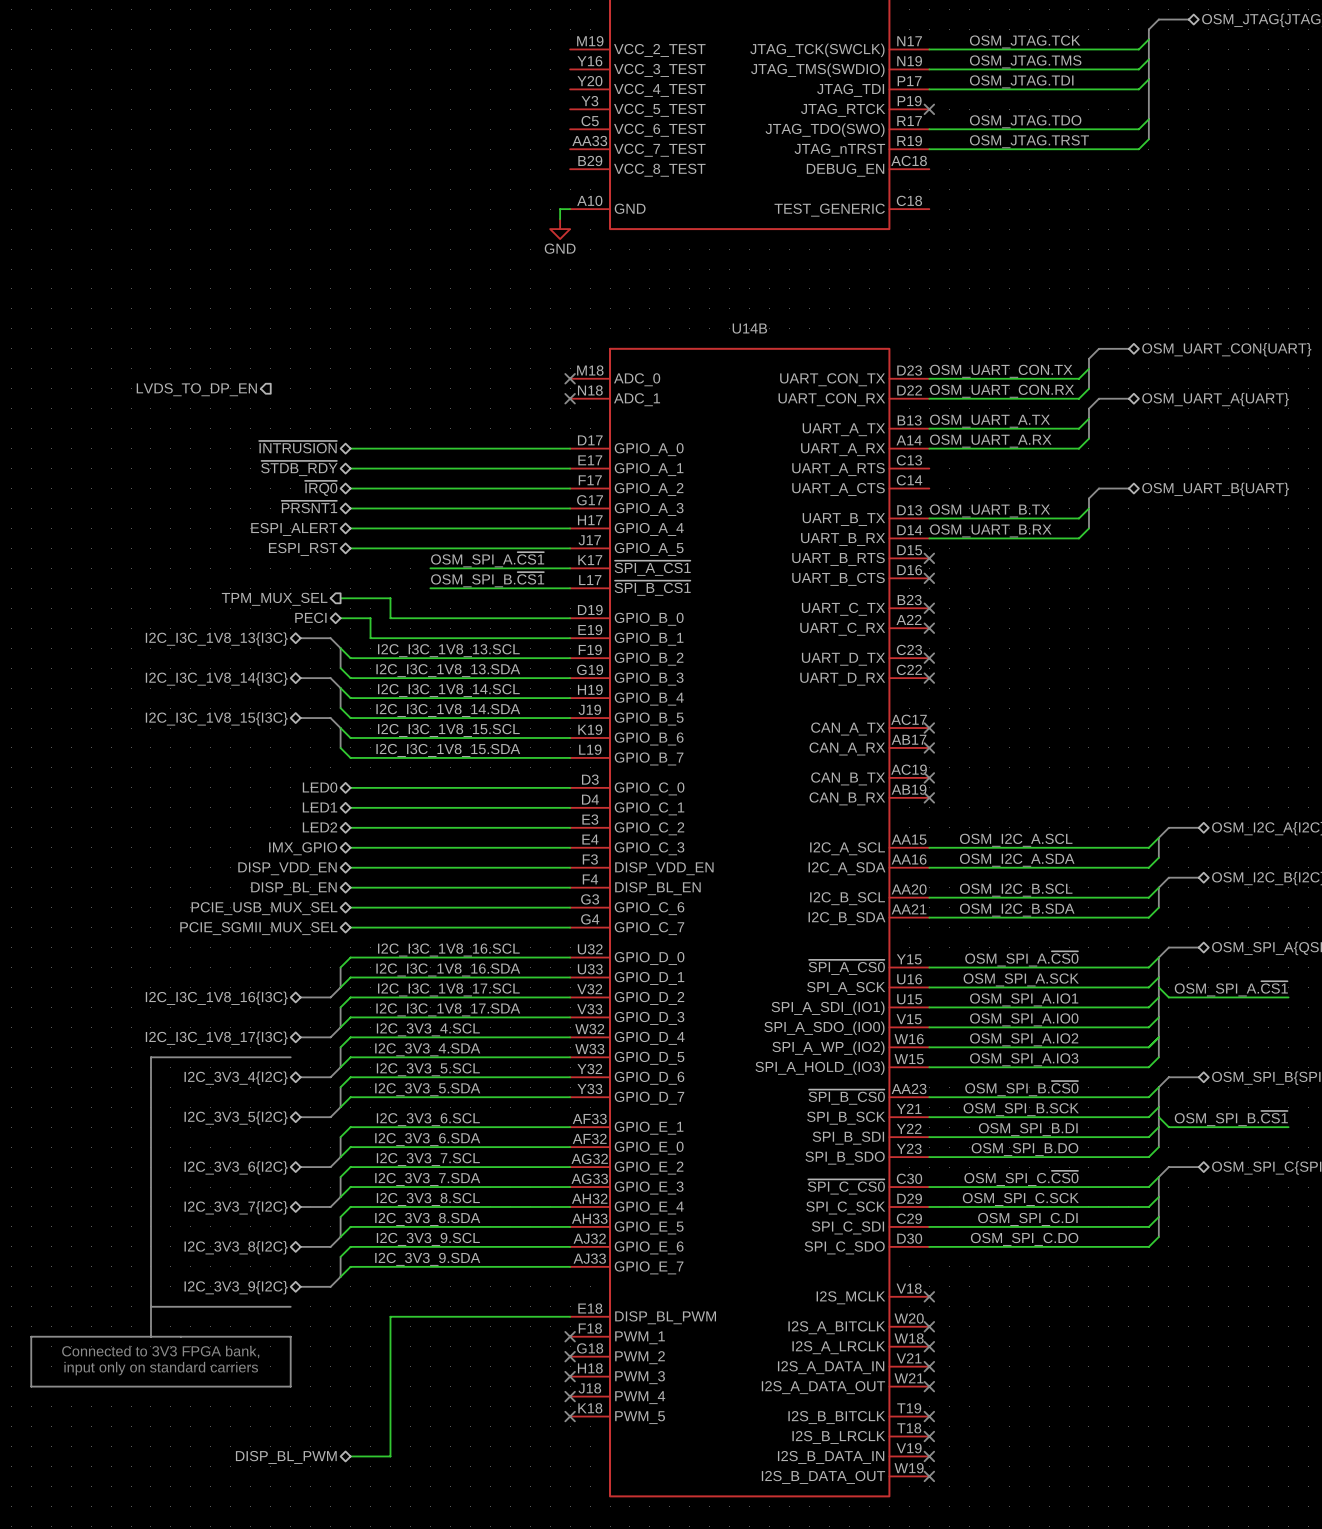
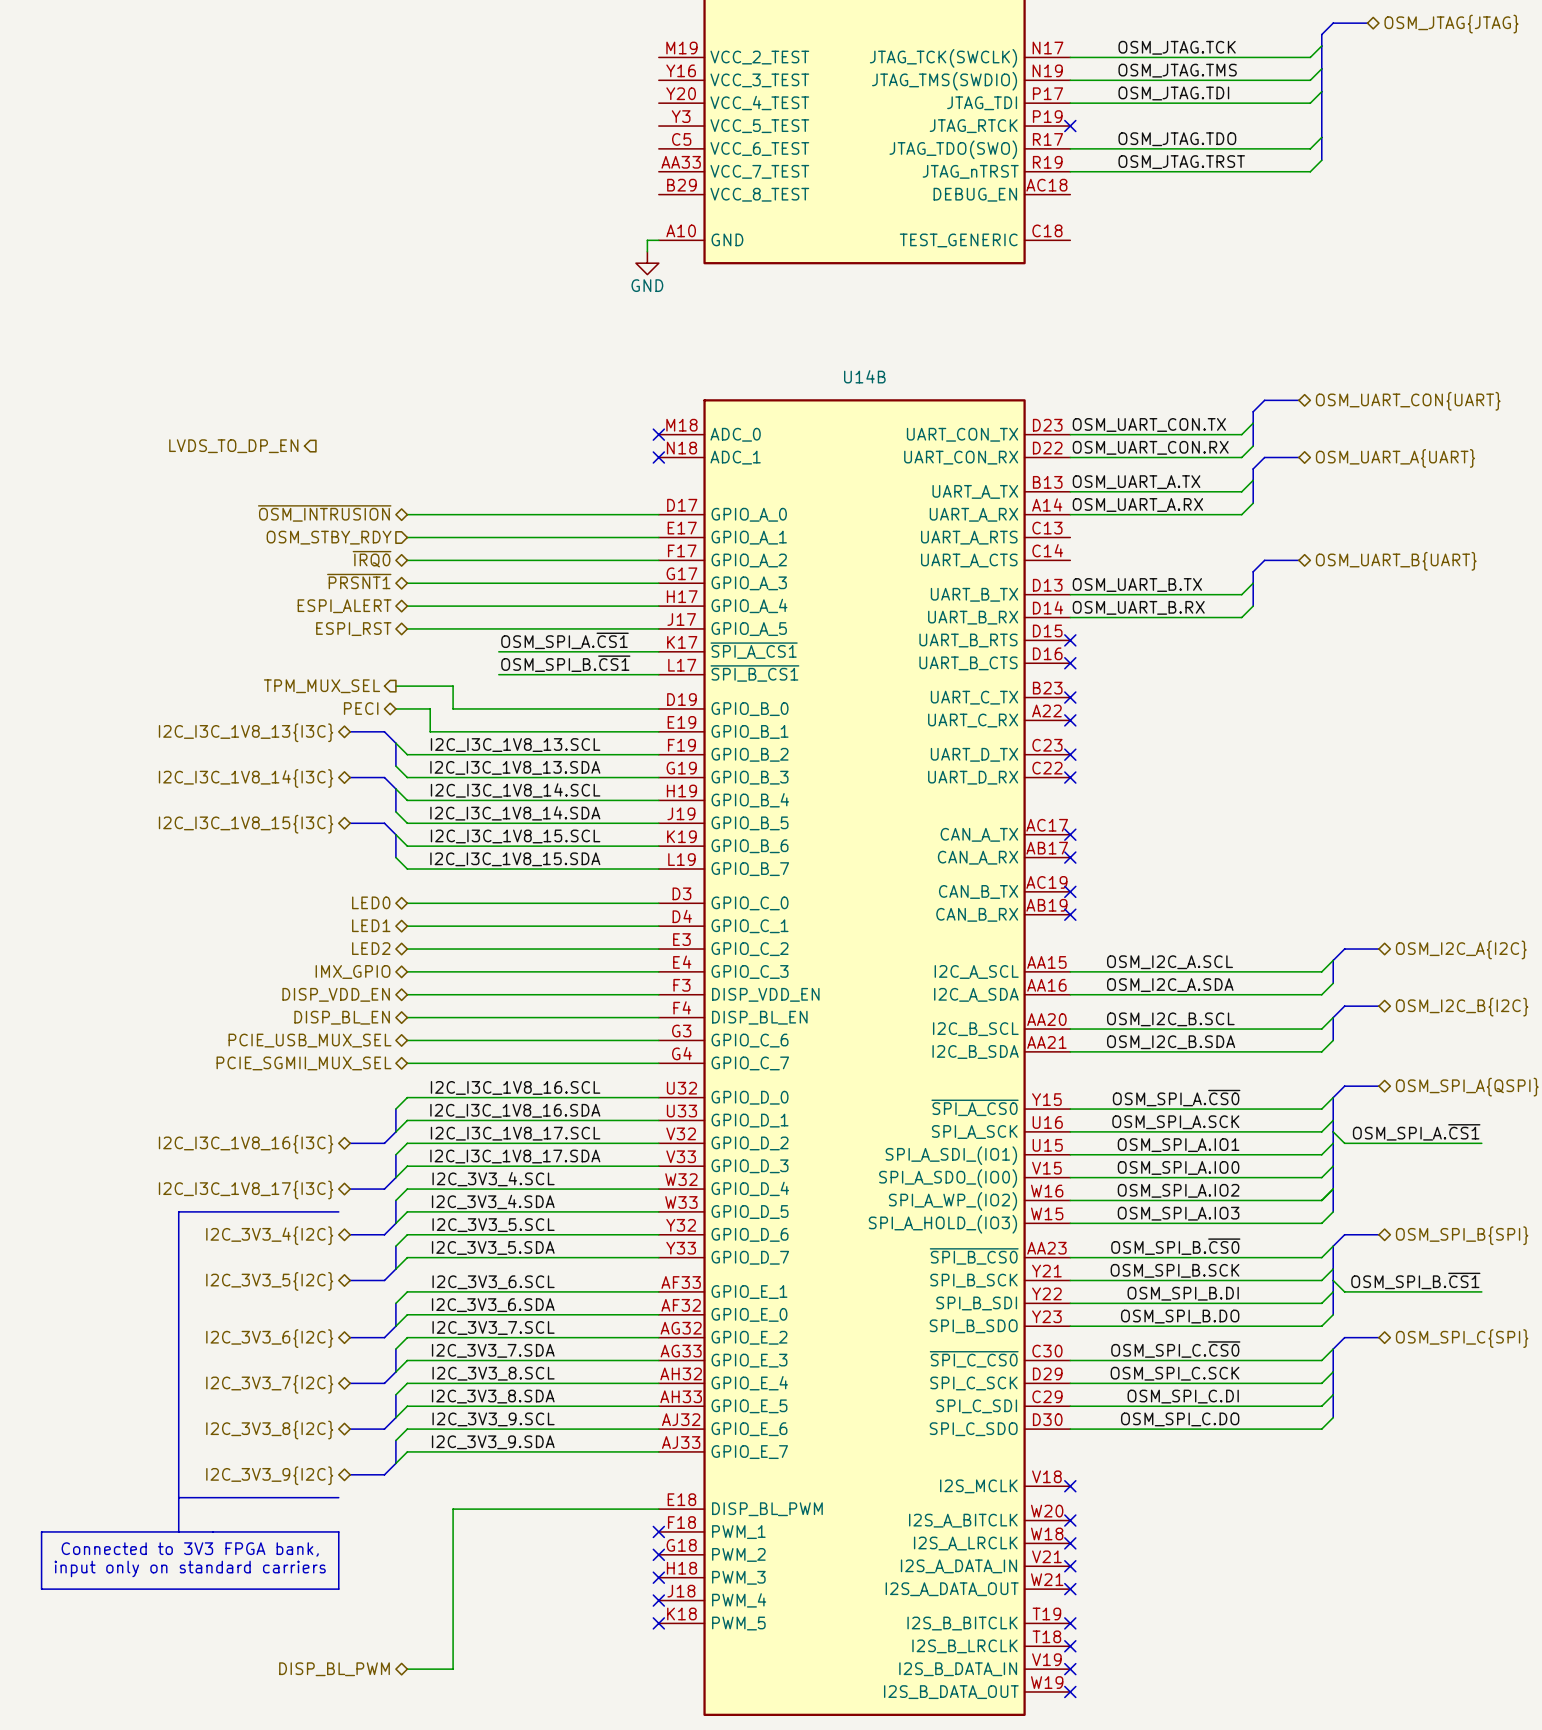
hierarchical label: ~{INTRUSION} (298, 447) -> ~{OSM_INTRUSION} (324, 513)
hierarchical label shape: bidirectional (299, 468) -> input (329, 537)
hierarchical label: ~{STDB_RDY} (299, 468) -> OSM_STBY_RDY (329, 537)

